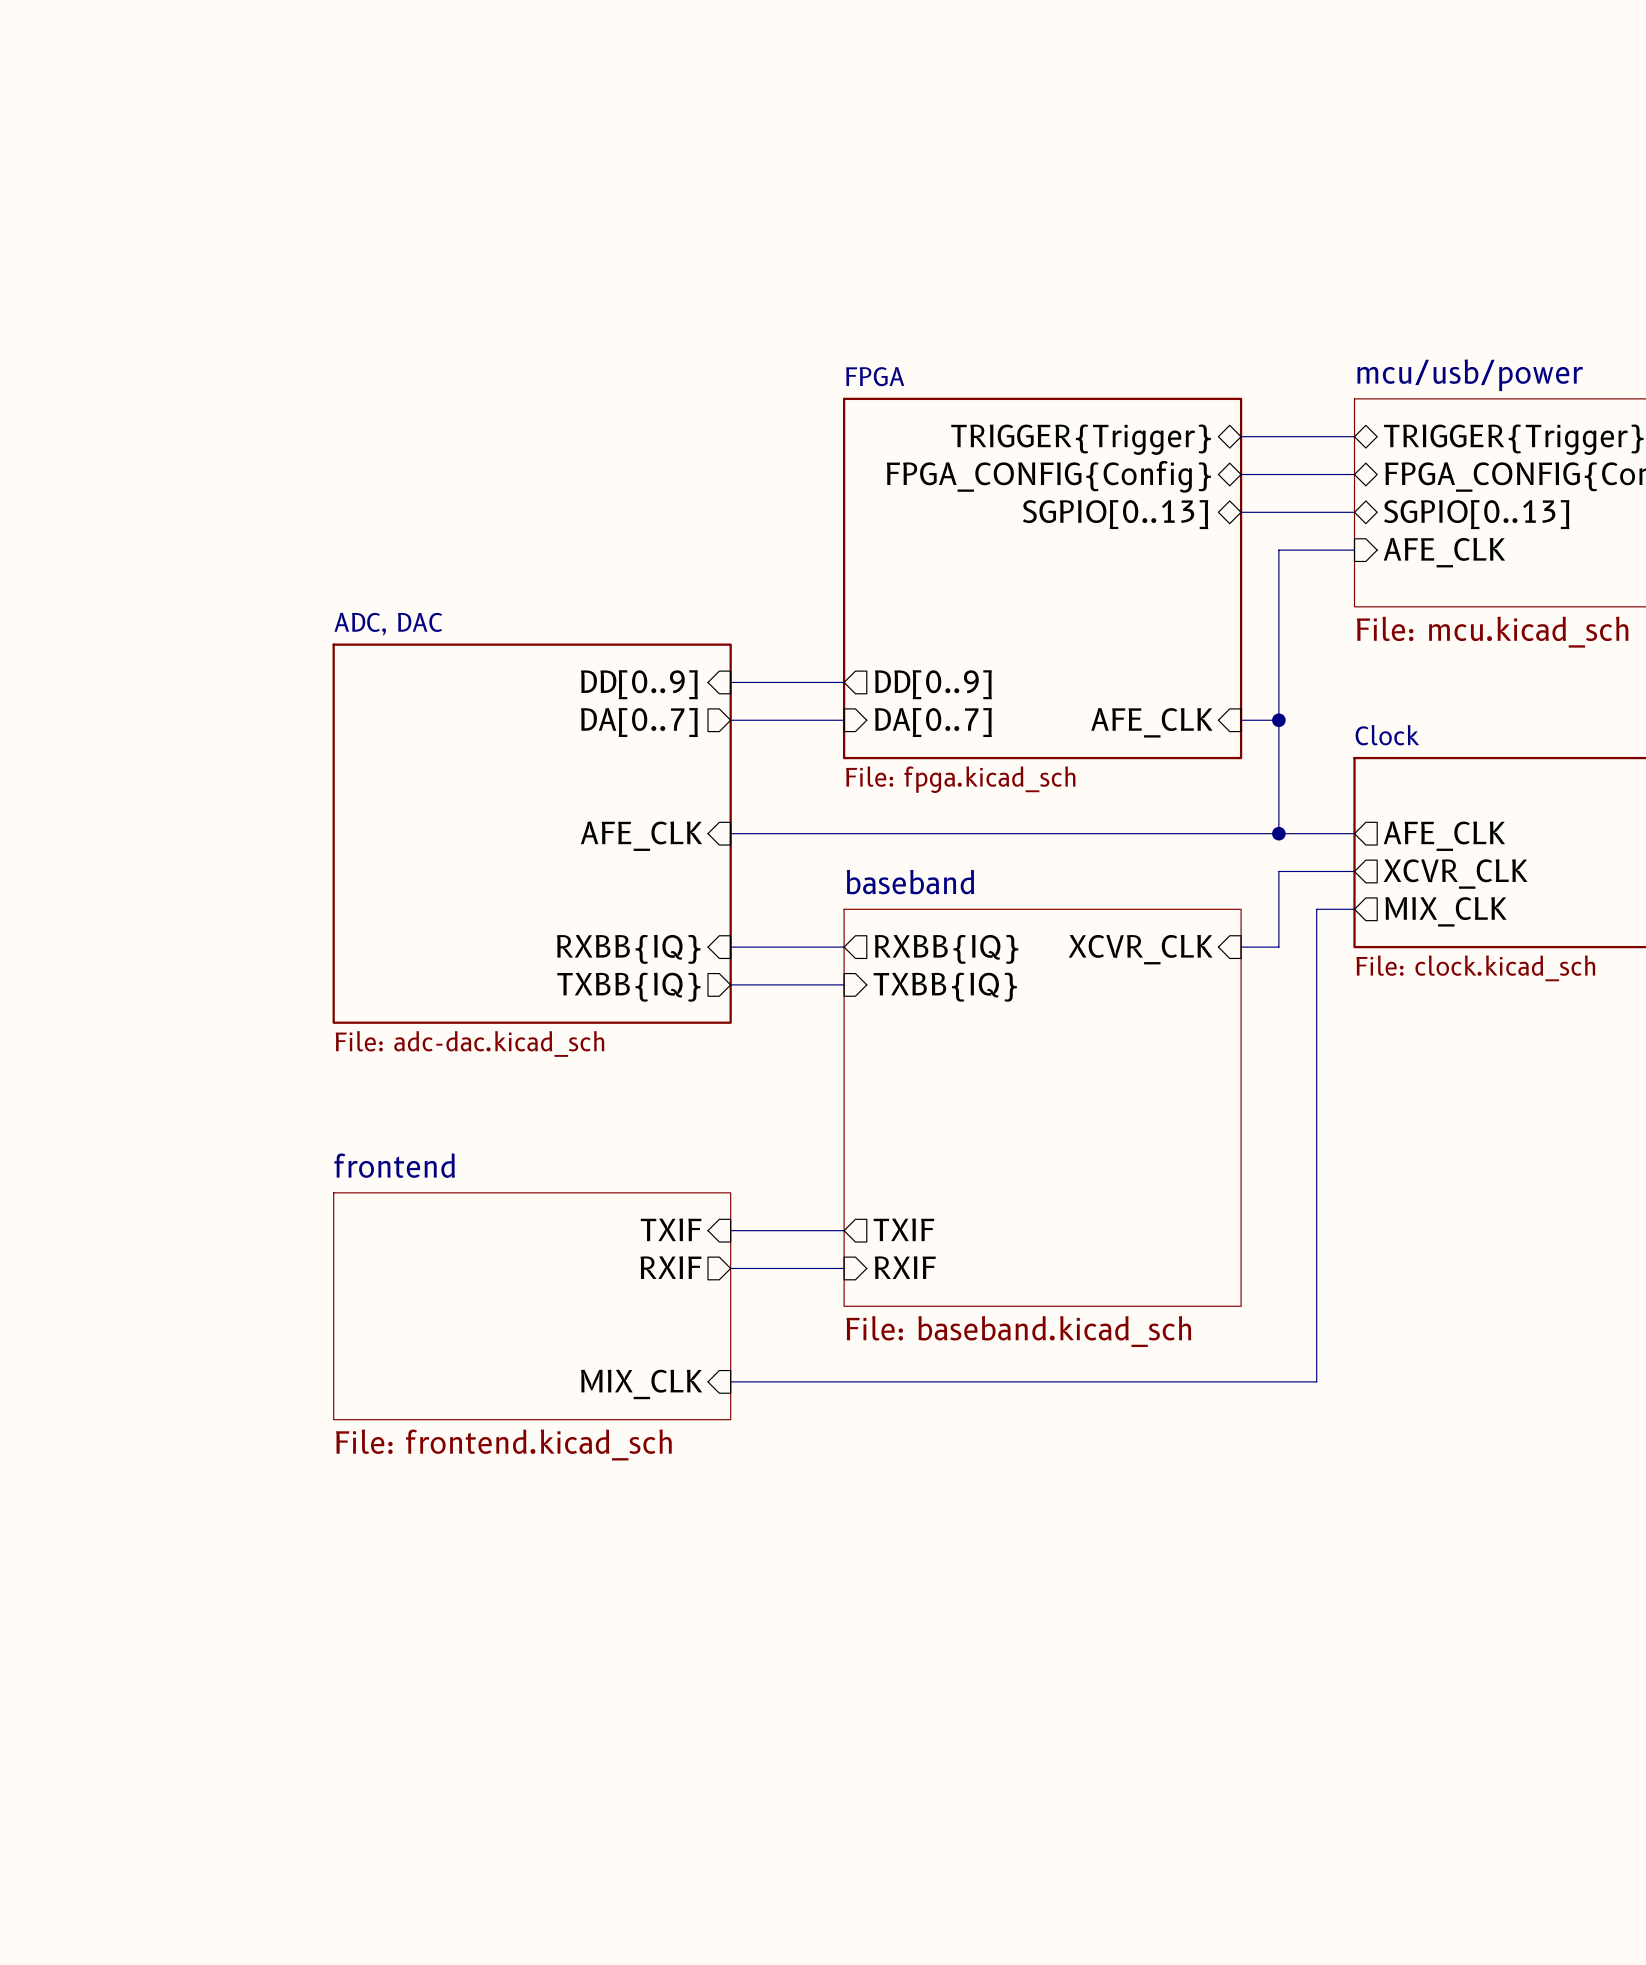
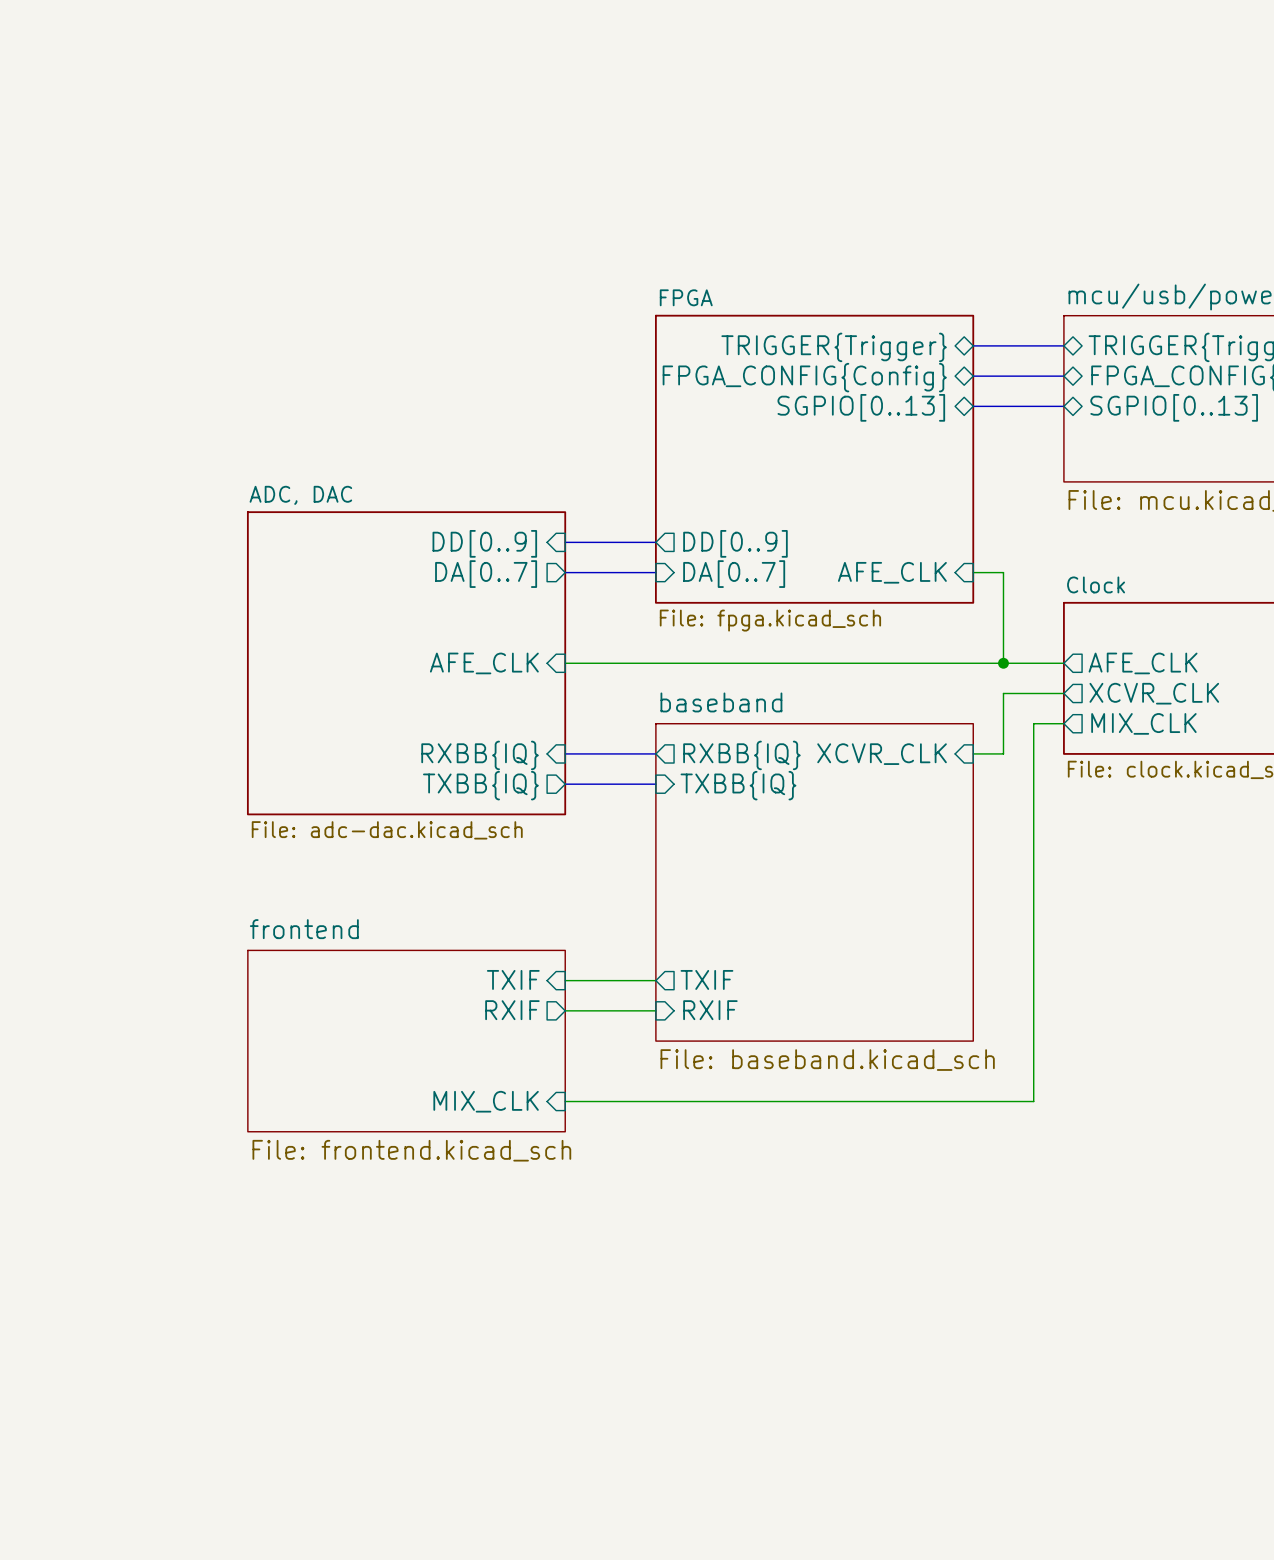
wire: (1354, 550) (1278, 550) (1278, 720) -> none
sheet pin: AFE_CLK (1444, 552) -> none
junction: (1278, 720) -> none

